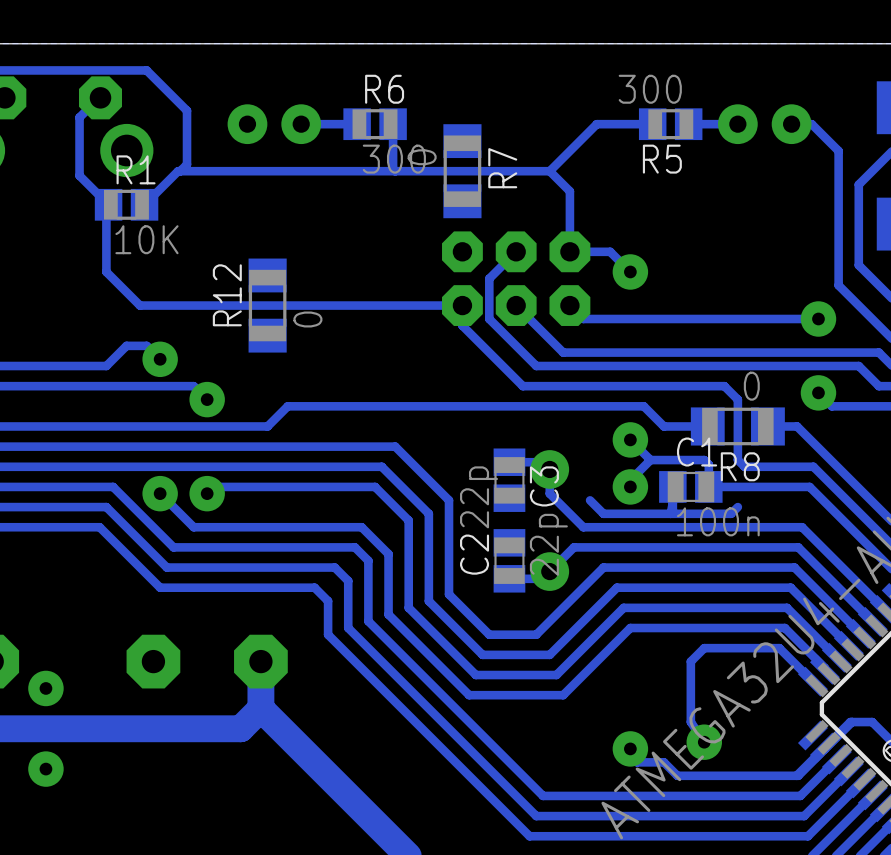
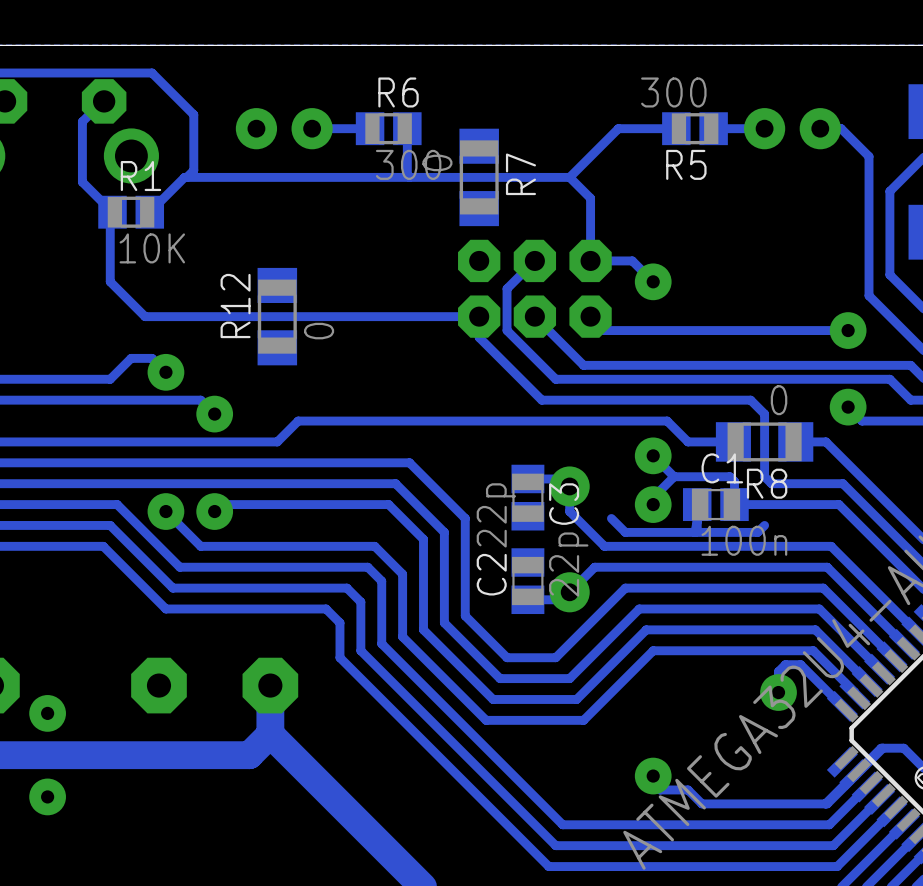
track: (779, 648) (704, 648) (690, 661) (690, 722) (704, 742) -> (807, 671) (800, 664) (785, 664) (778, 671) (778, 692)
via position: (704, 742) -> (778, 692)

